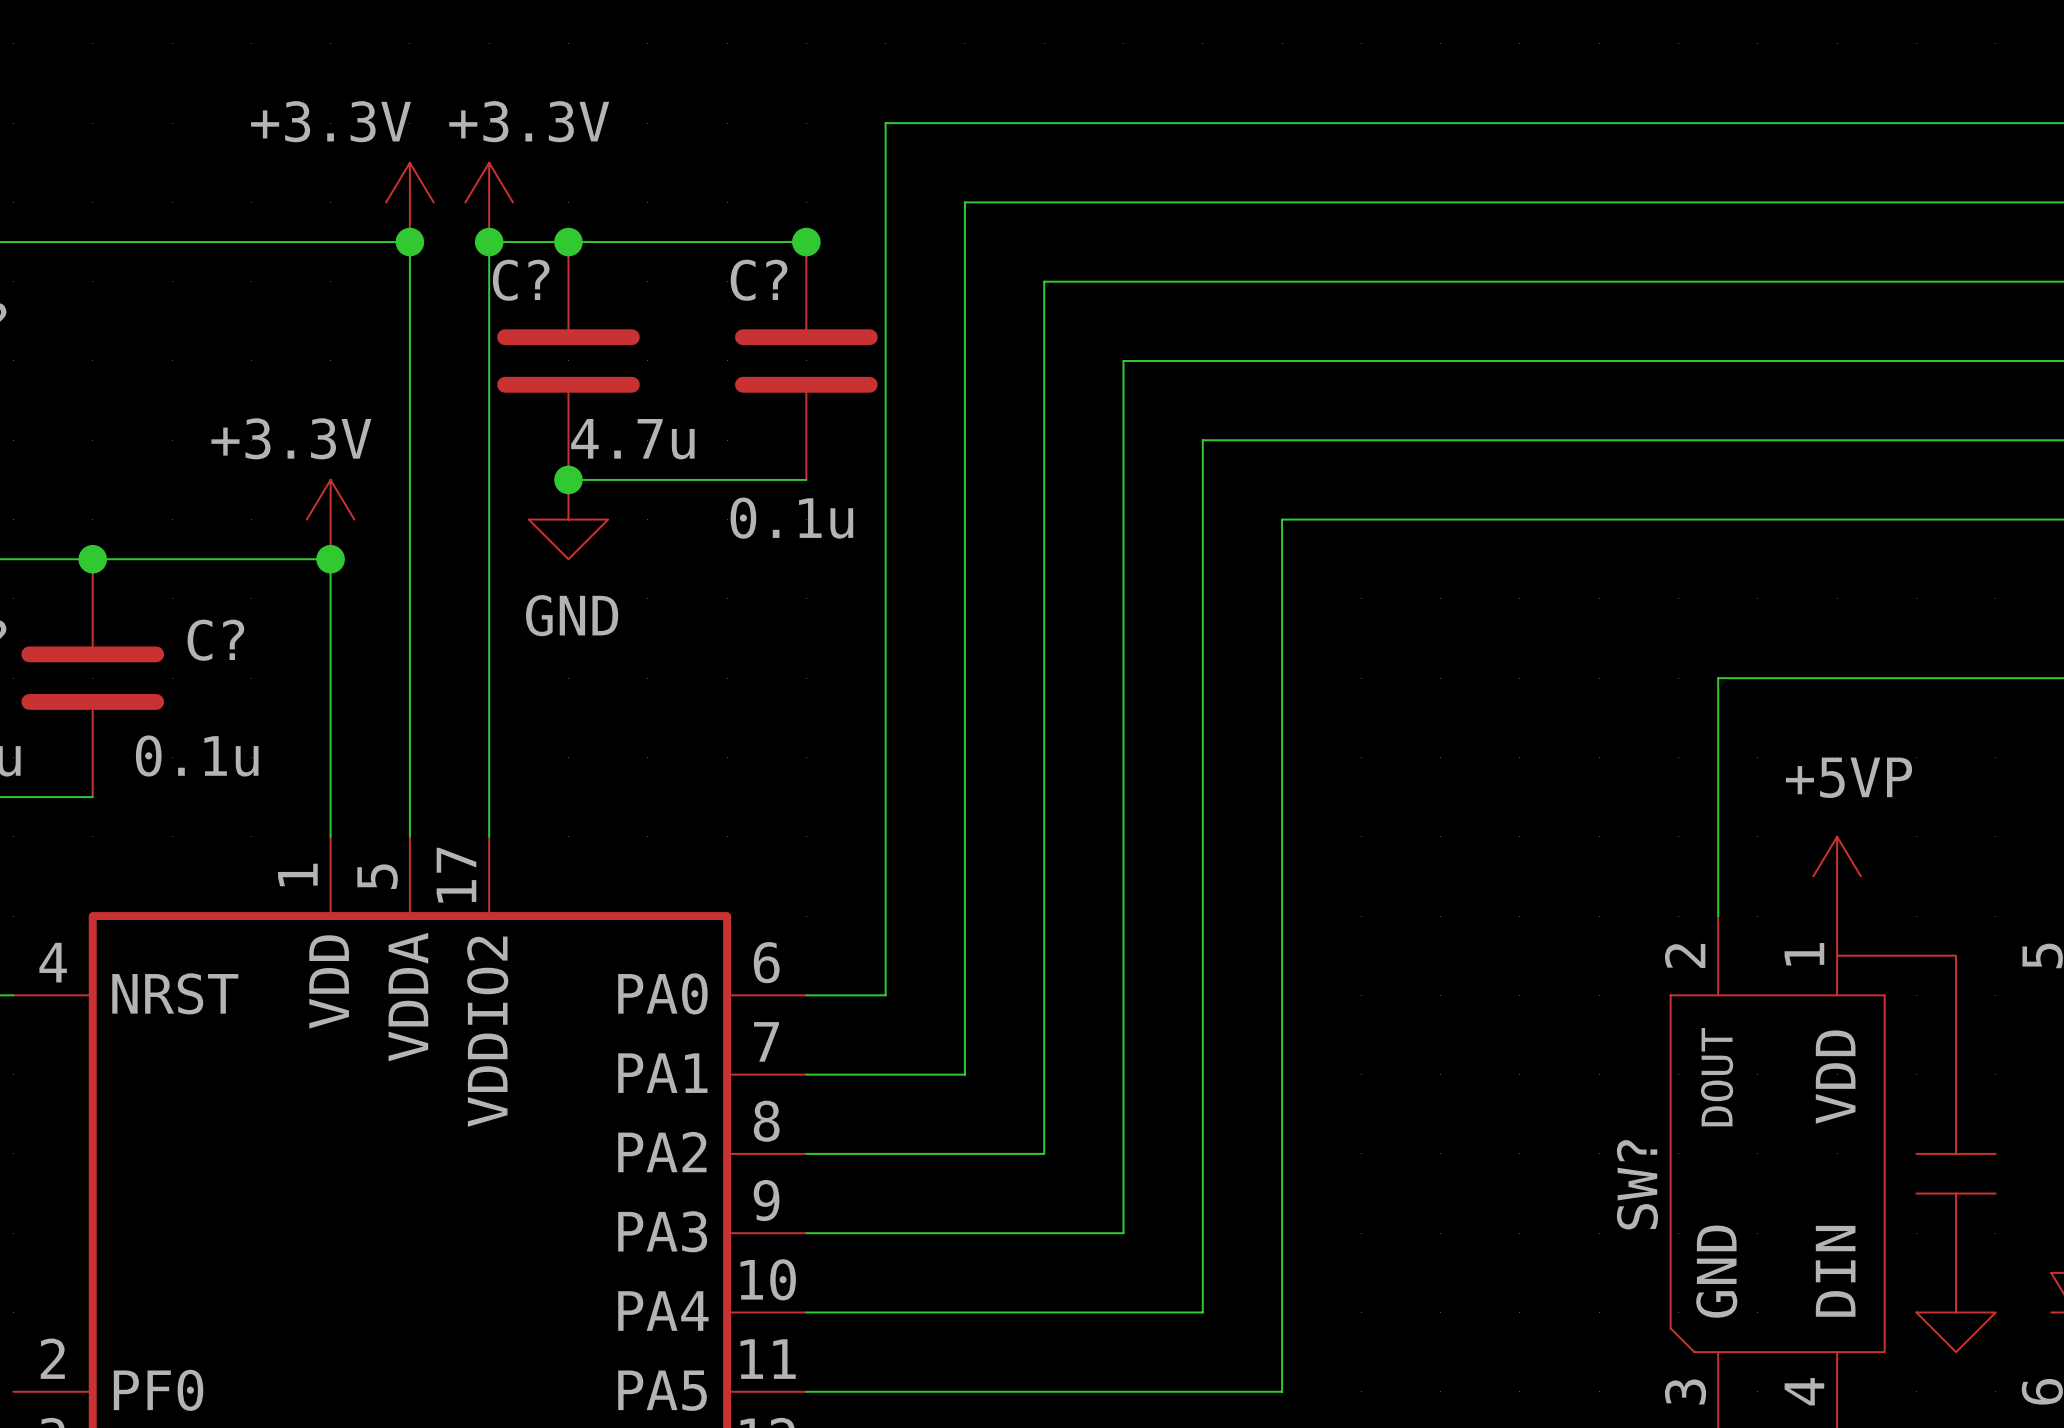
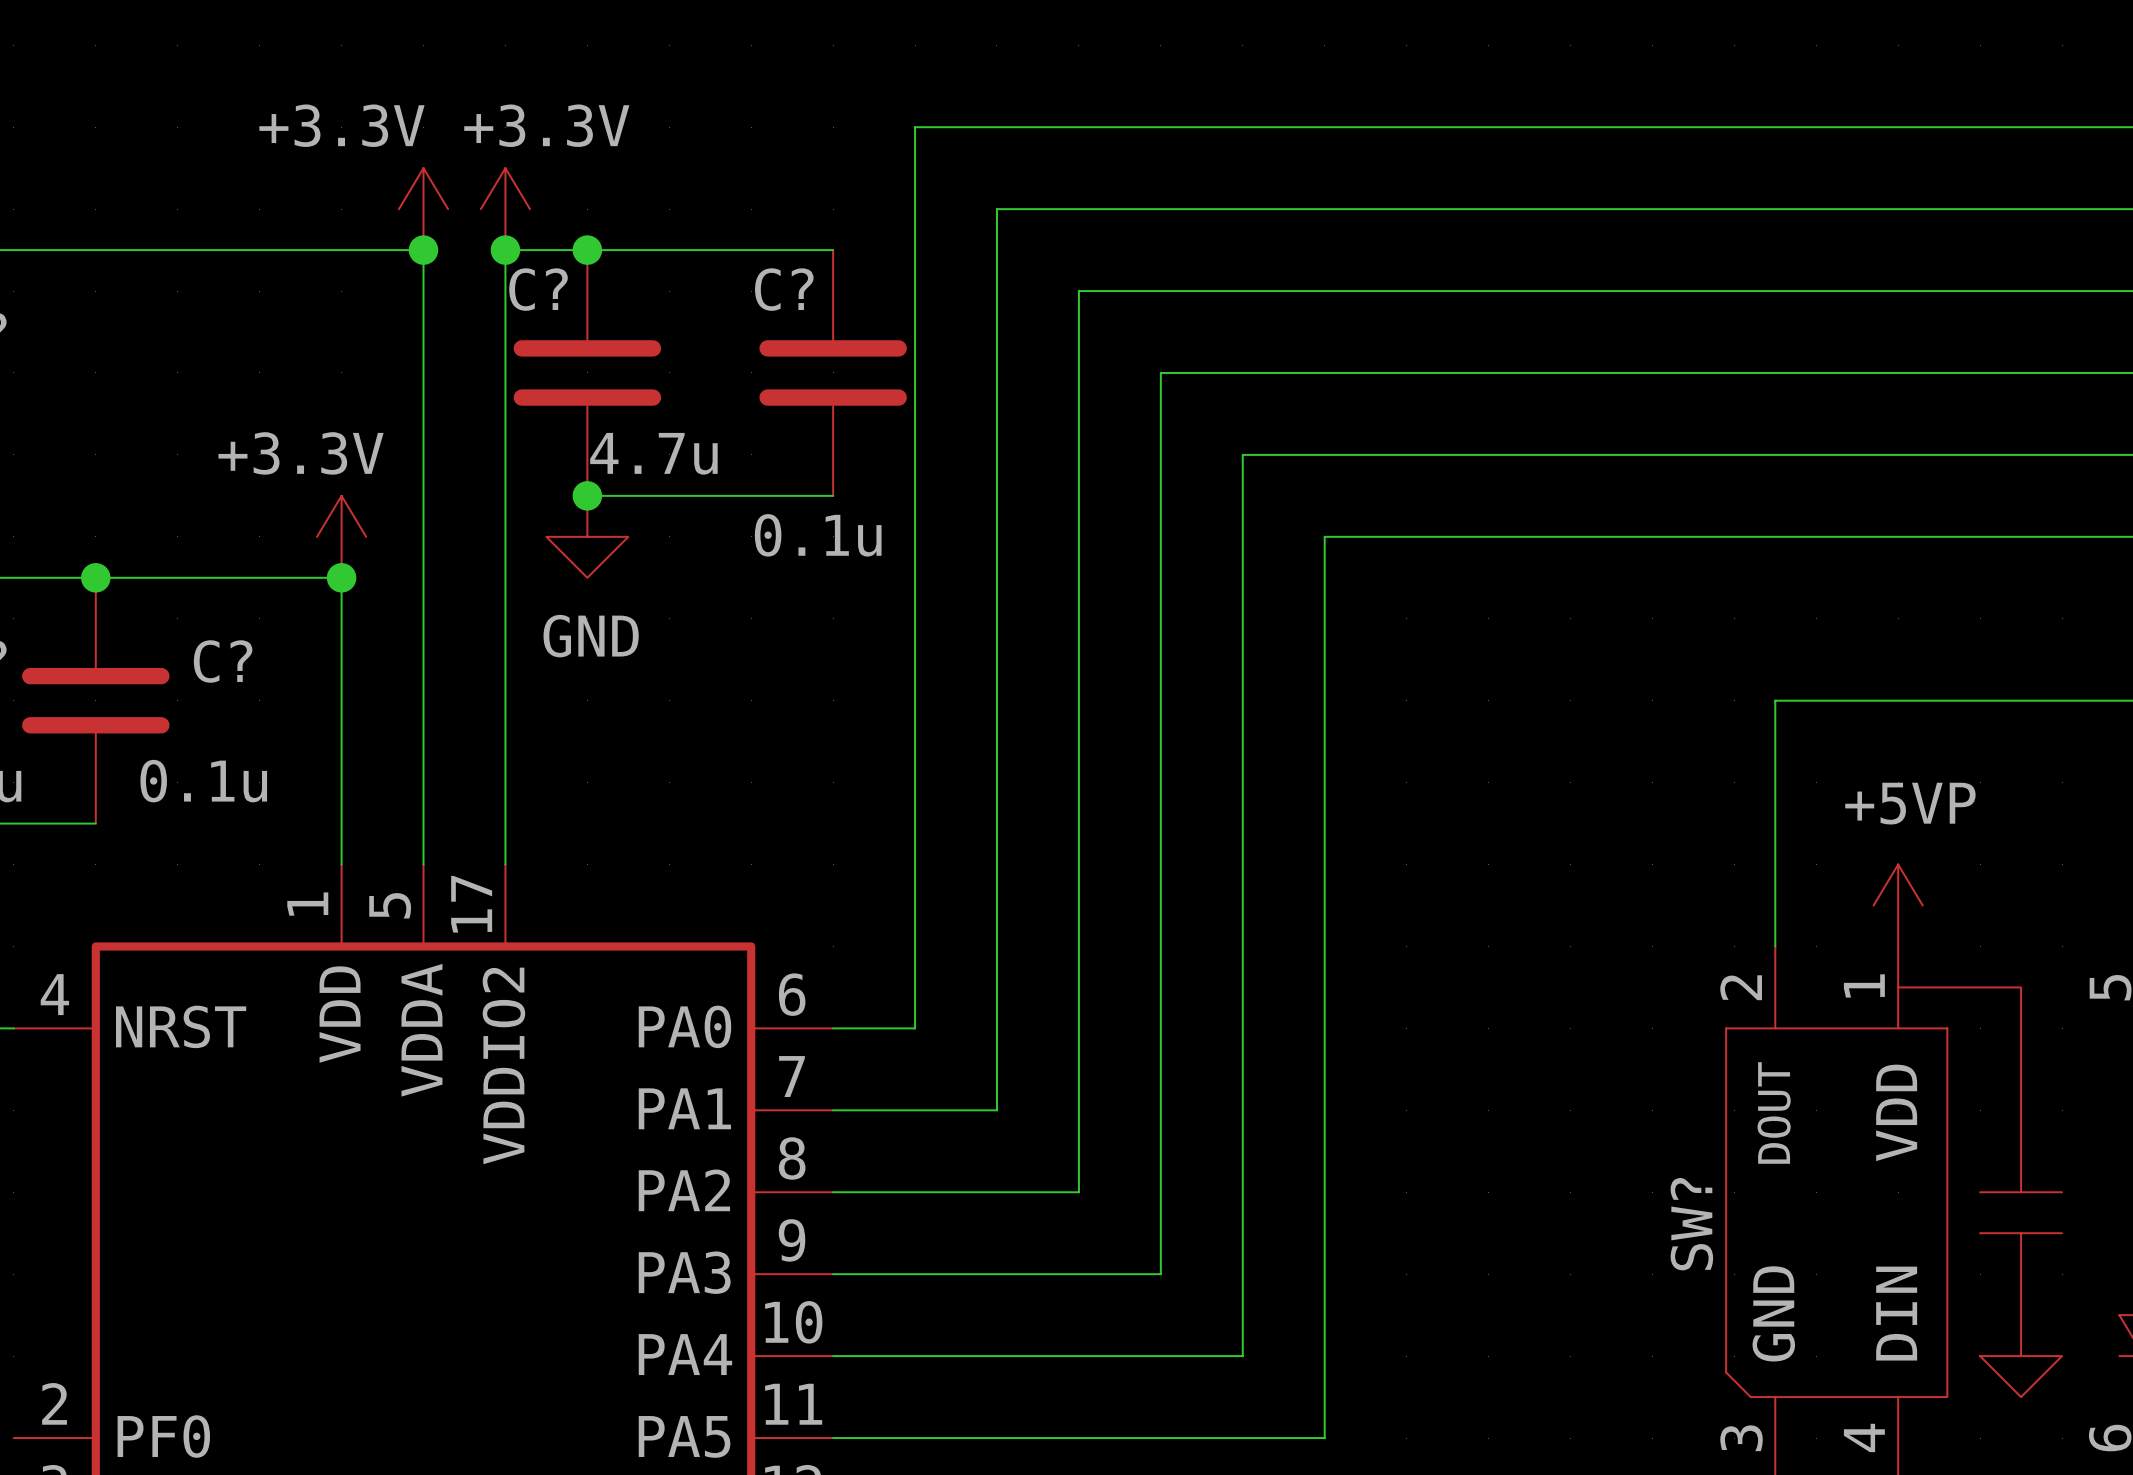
junction: (806, 242) -> none

